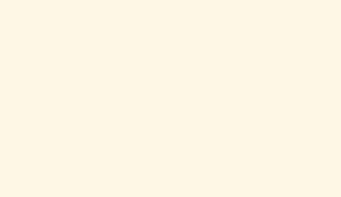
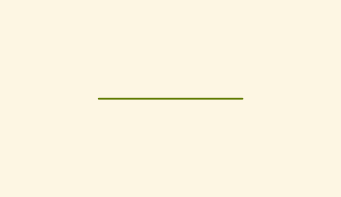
wire: none -> (98, 98) (242, 98)

